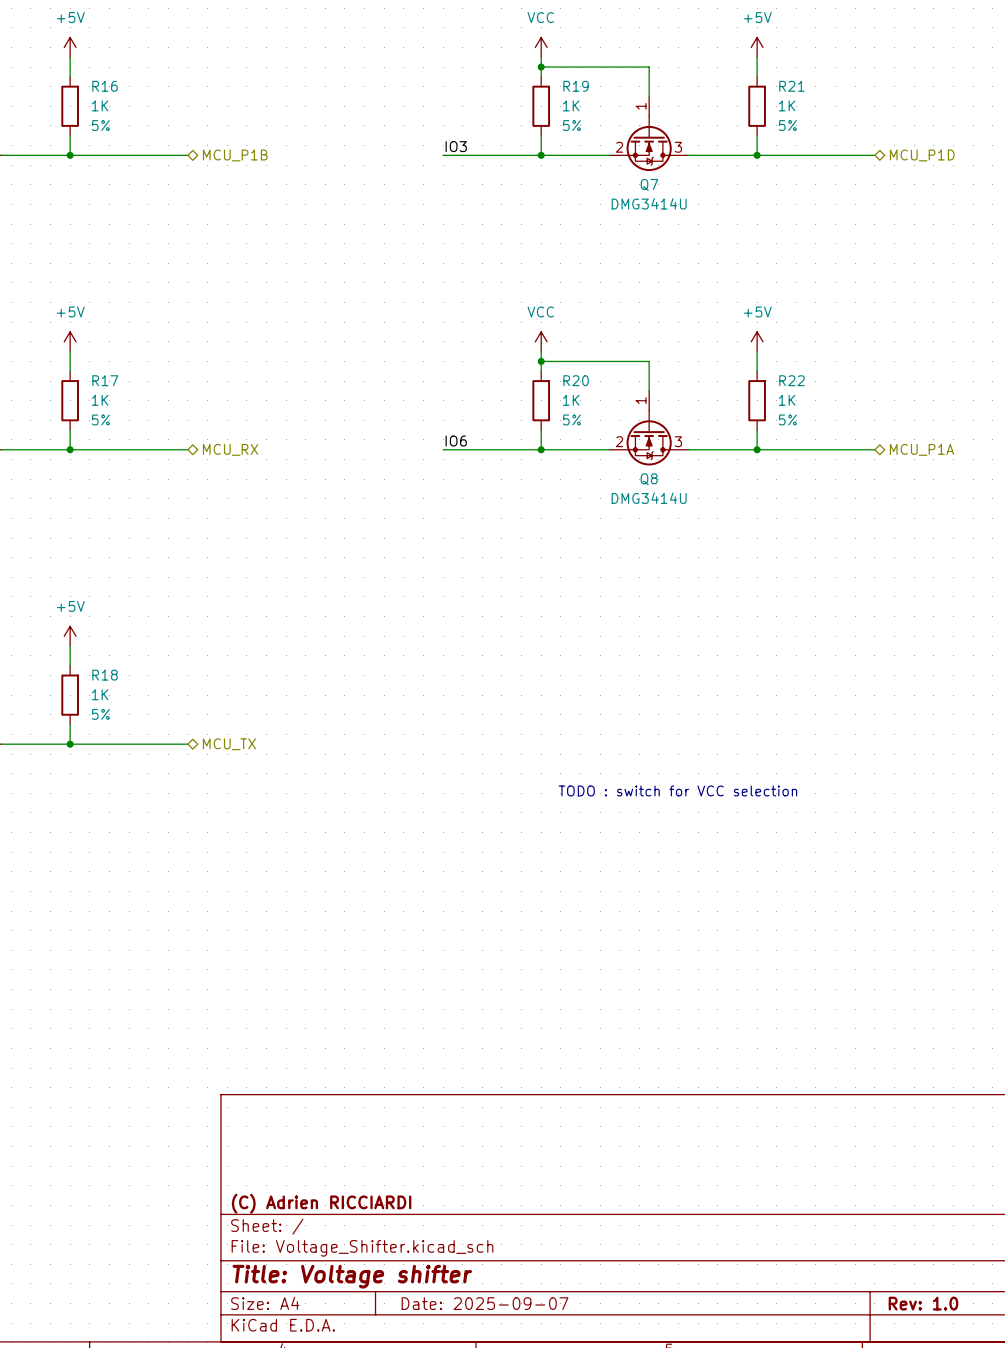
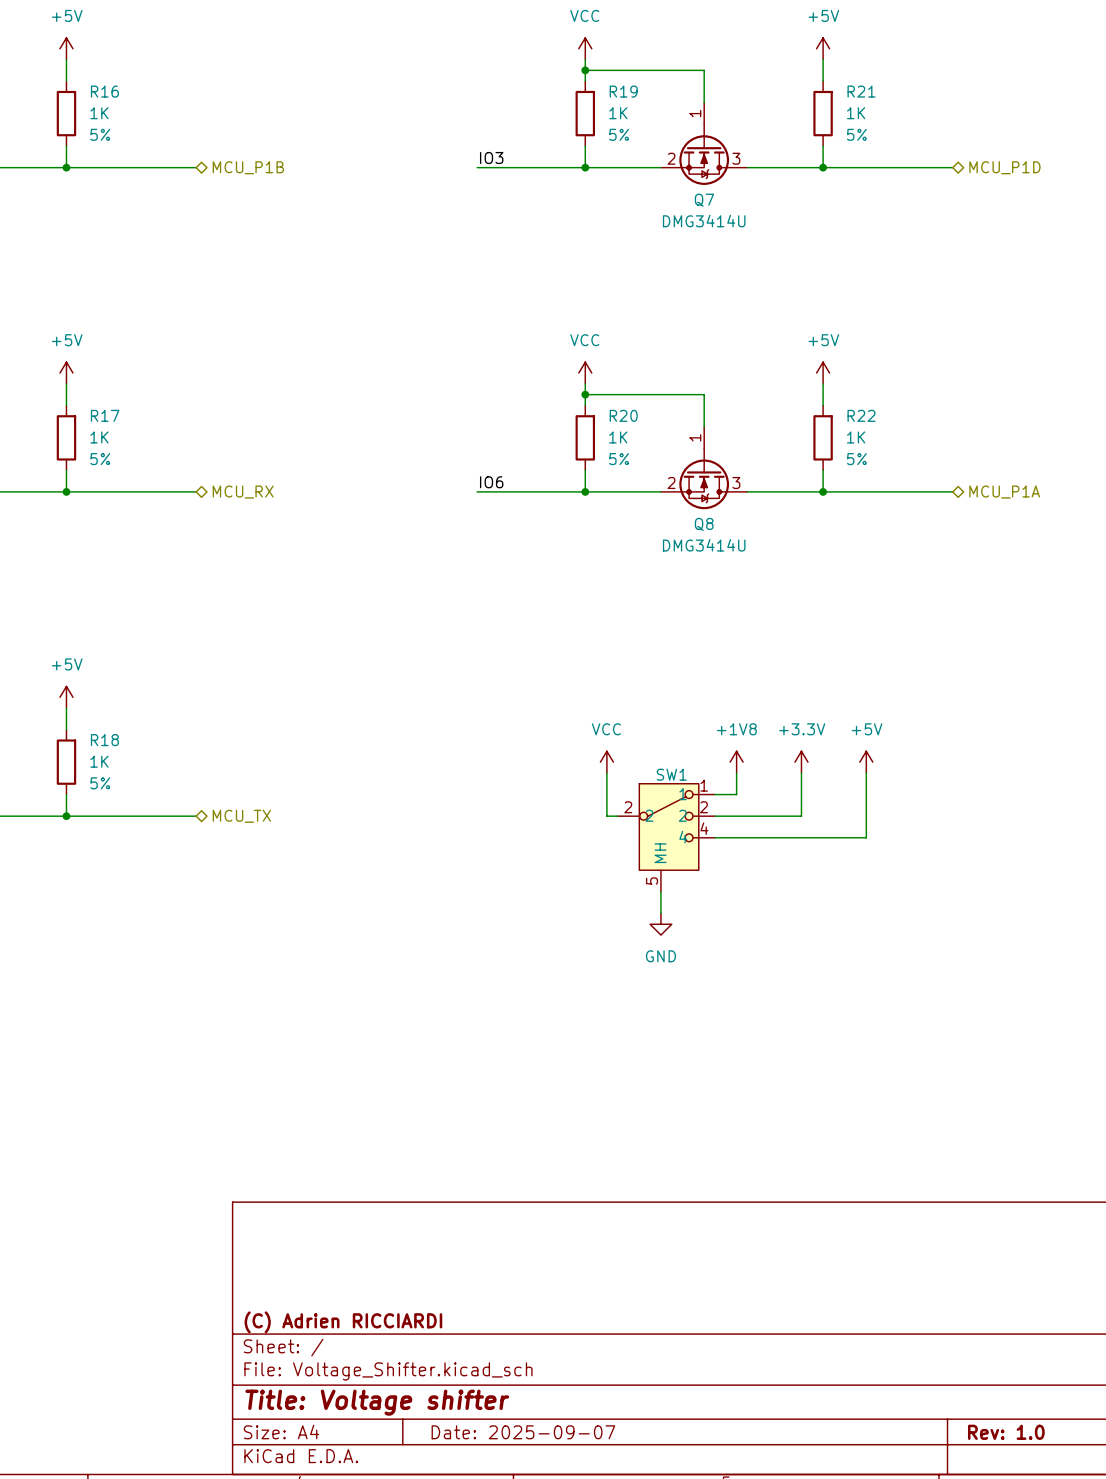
power symbol: none -> VCC (606, 762)
power symbol: none -> +1V8 (736, 762)
power symbol: none -> +3.3V (801, 762)
power symbol: none -> +5V (866, 762)
wire: none -> (606, 772) (606, 816) (617, 816)
wire: none -> (736, 772) (736, 794) (714, 794)
wire: none -> (801, 772) (801, 816) (714, 816)
wire: none -> (866, 772) (866, 837) (714, 837)
SW1: none -> (666, 837)
text: TODO : switch for VCC selection (677, 790) -> none
wire: none -> (660, 891) (660, 913)
power symbol: none -> GND (660, 924)

